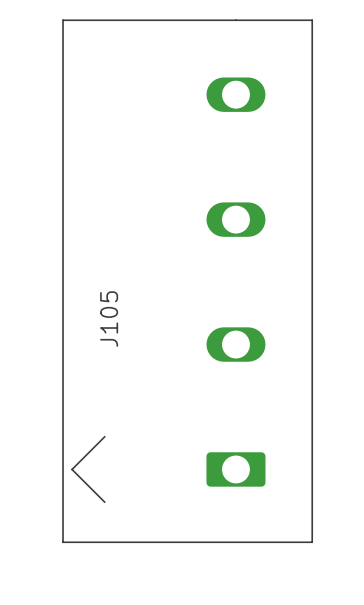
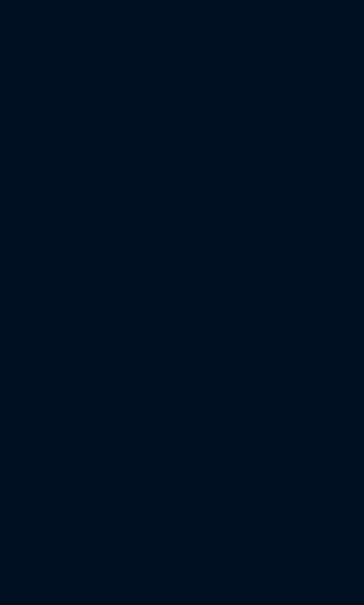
J105: (187, 281) -> none

